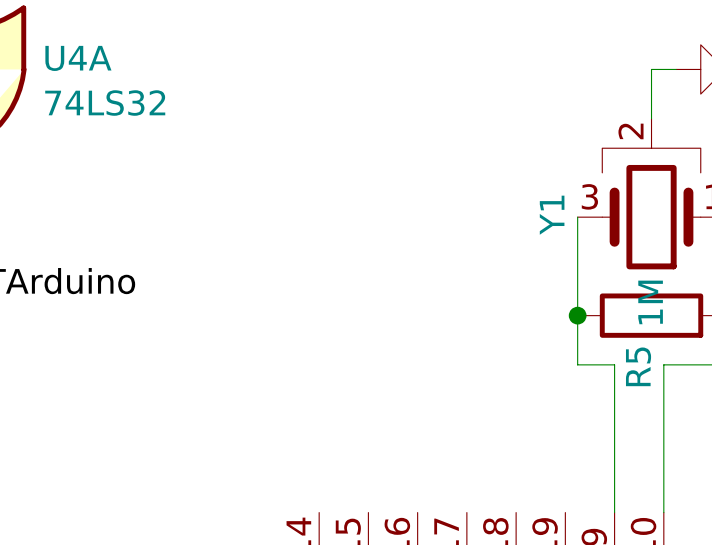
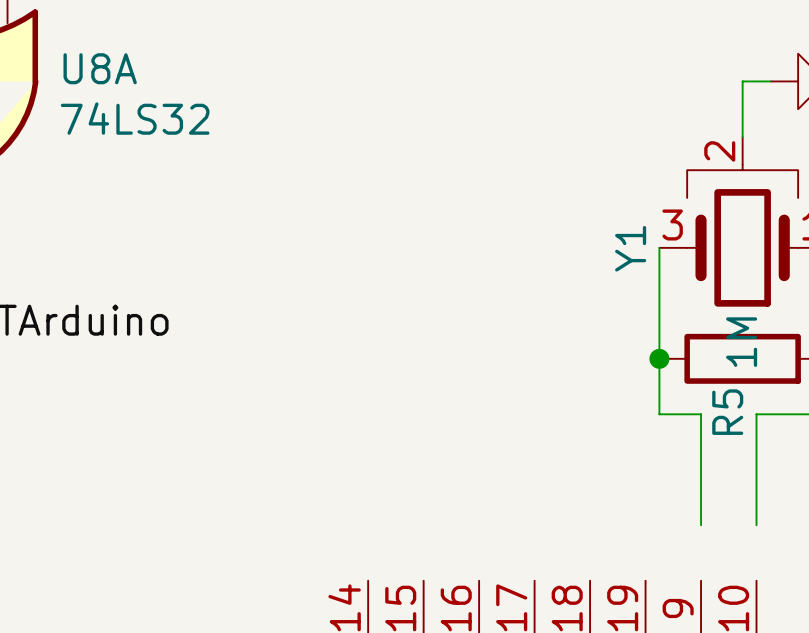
U4A name: U4A (78, 58) -> U8A (100, 68)
wire: (614, 463) (614, 512) -> none
wire: (663, 463) (663, 512) -> none

